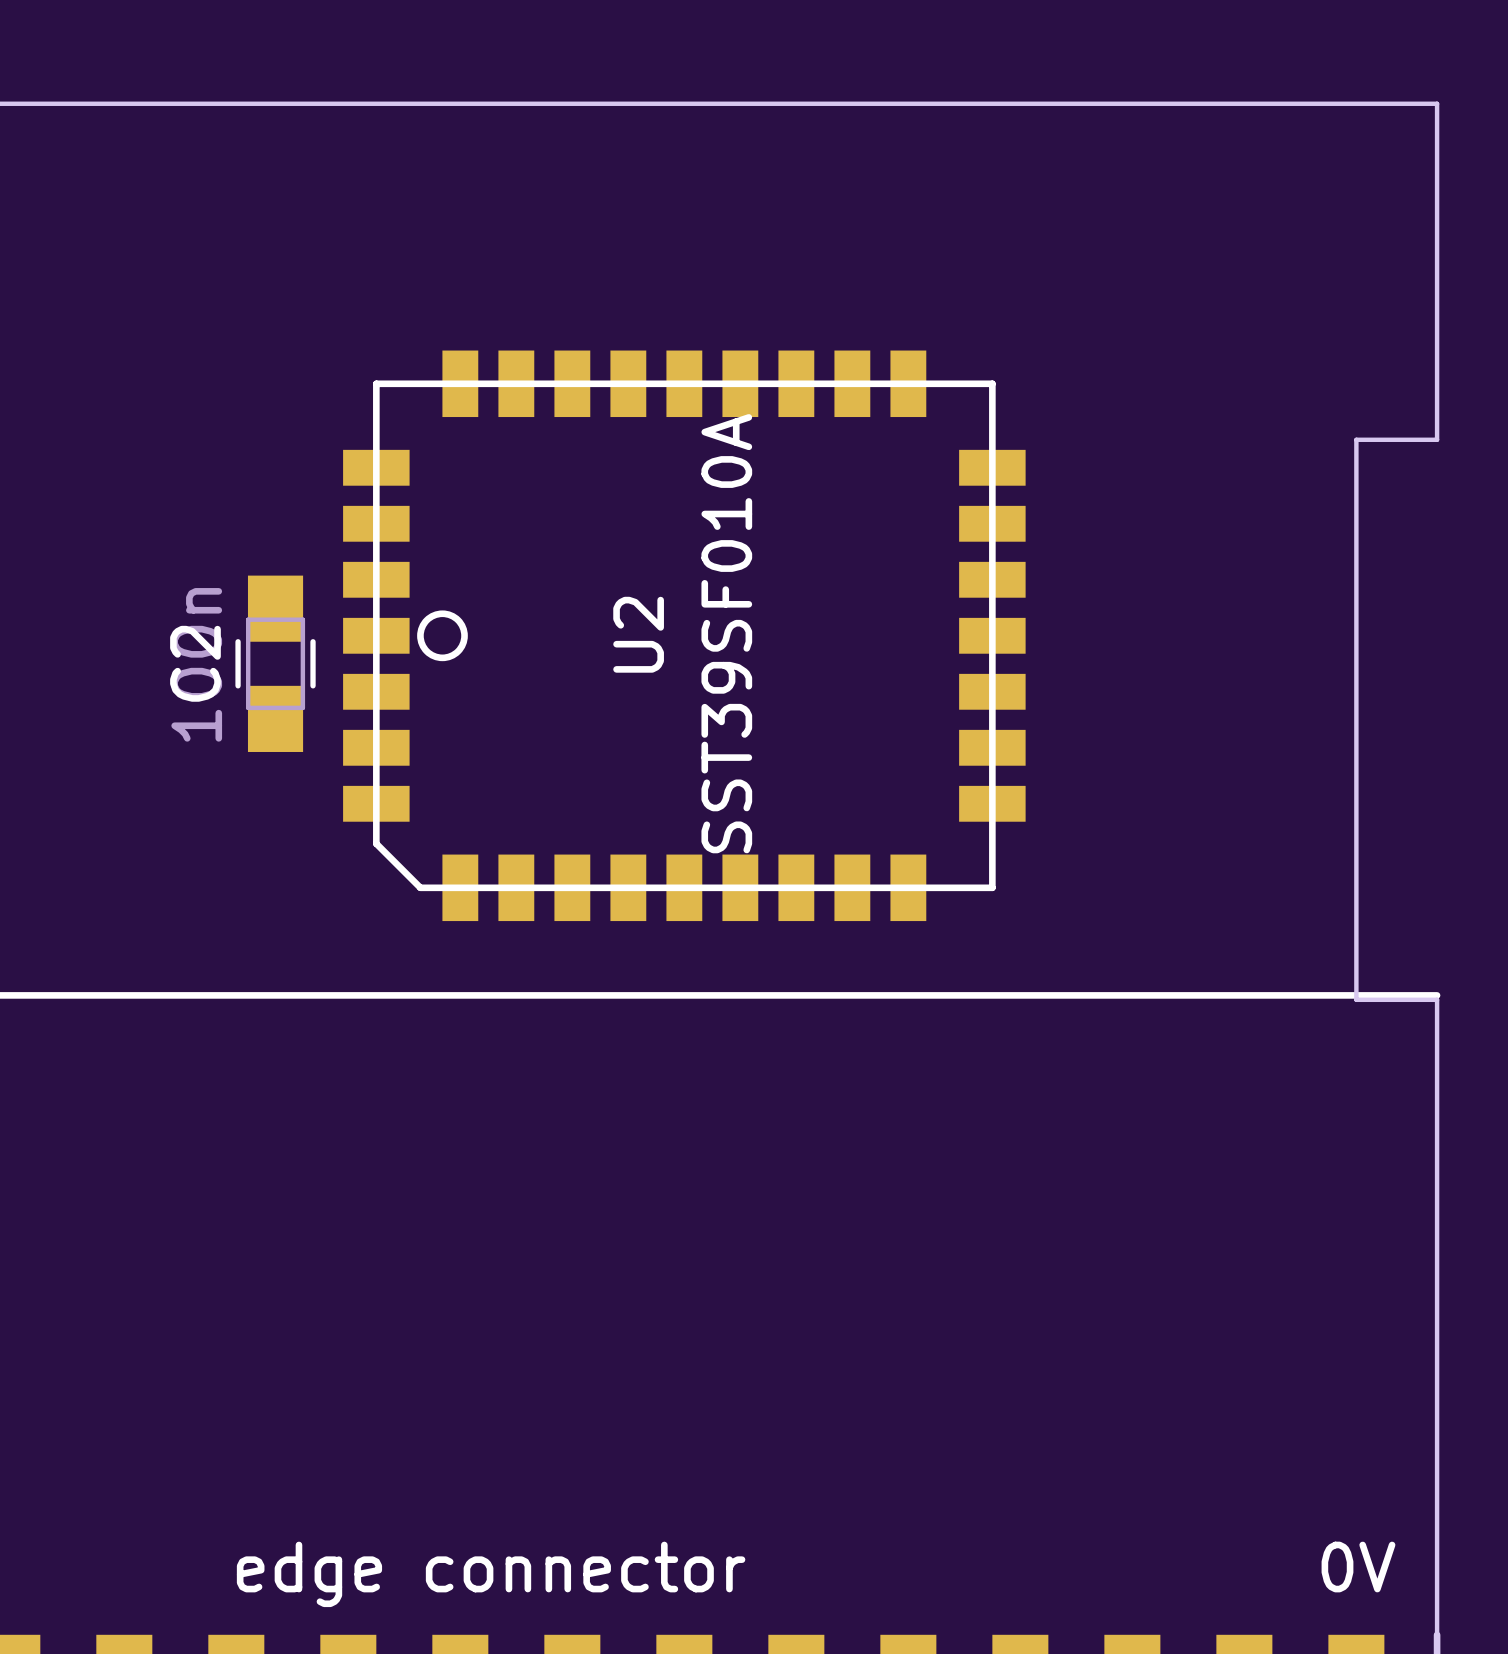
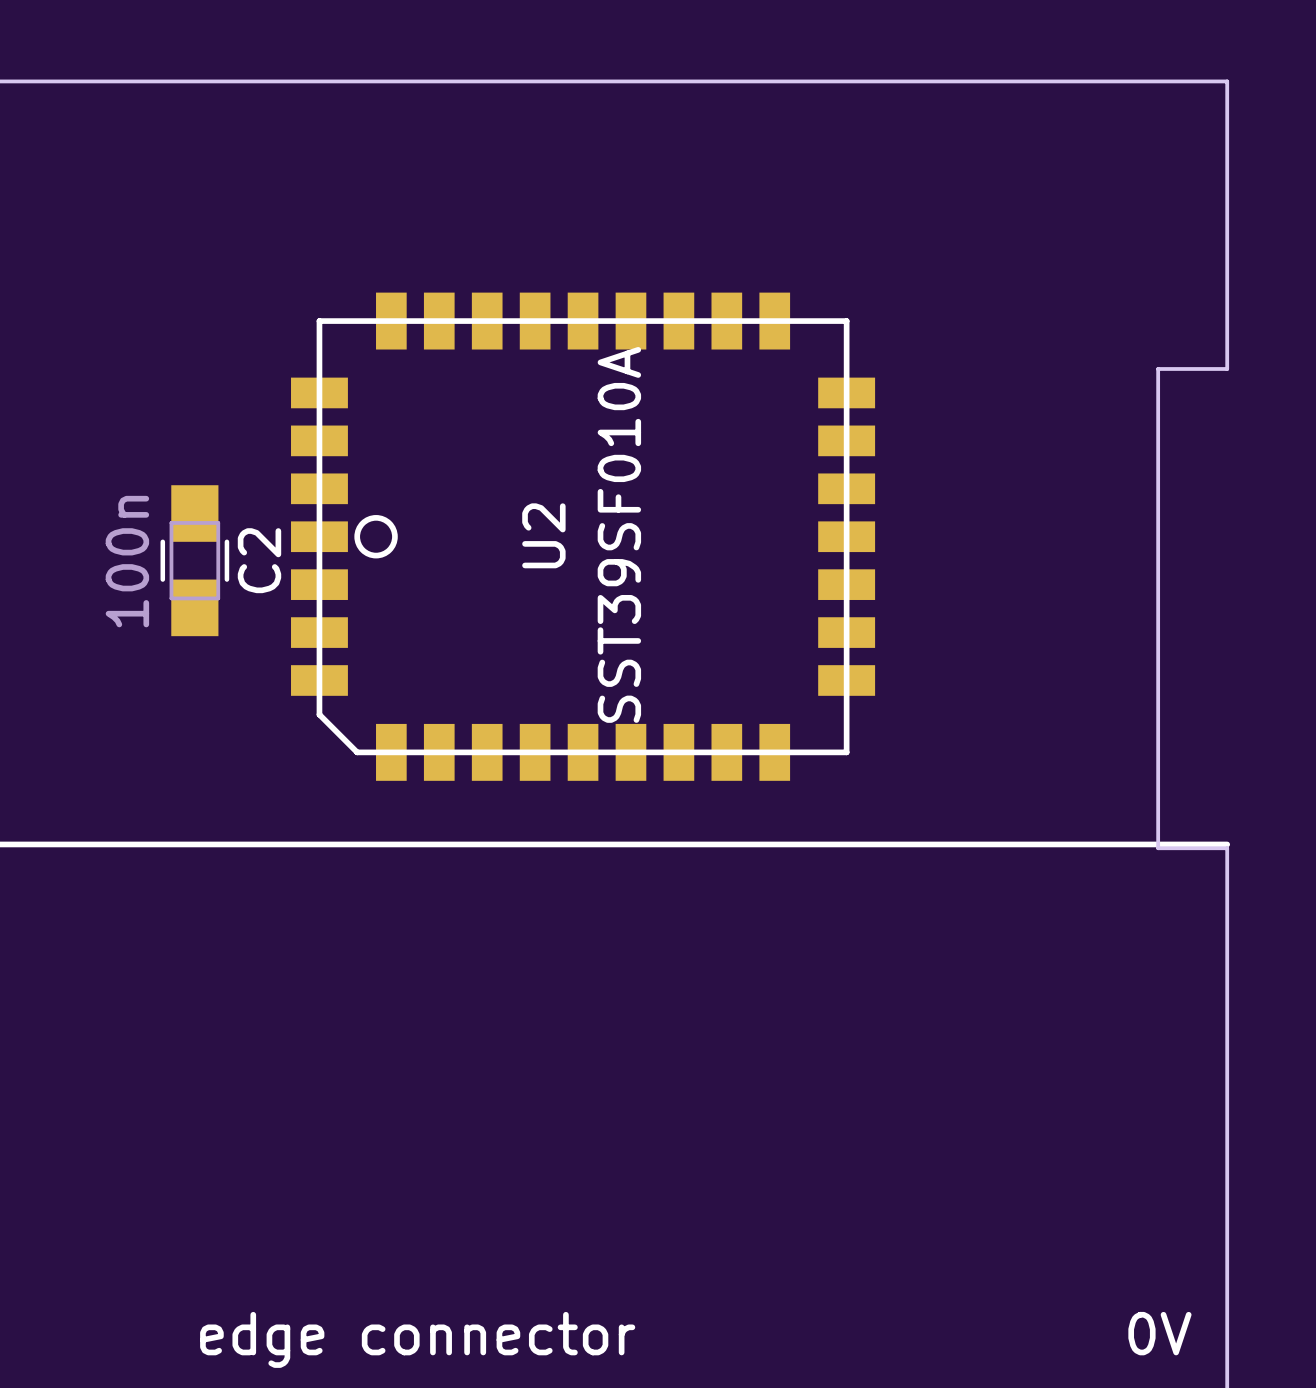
C2 name position: C2 (195, 663) -> C2 (259, 560)
C2 position: (275, 663) -> (194, 560)

